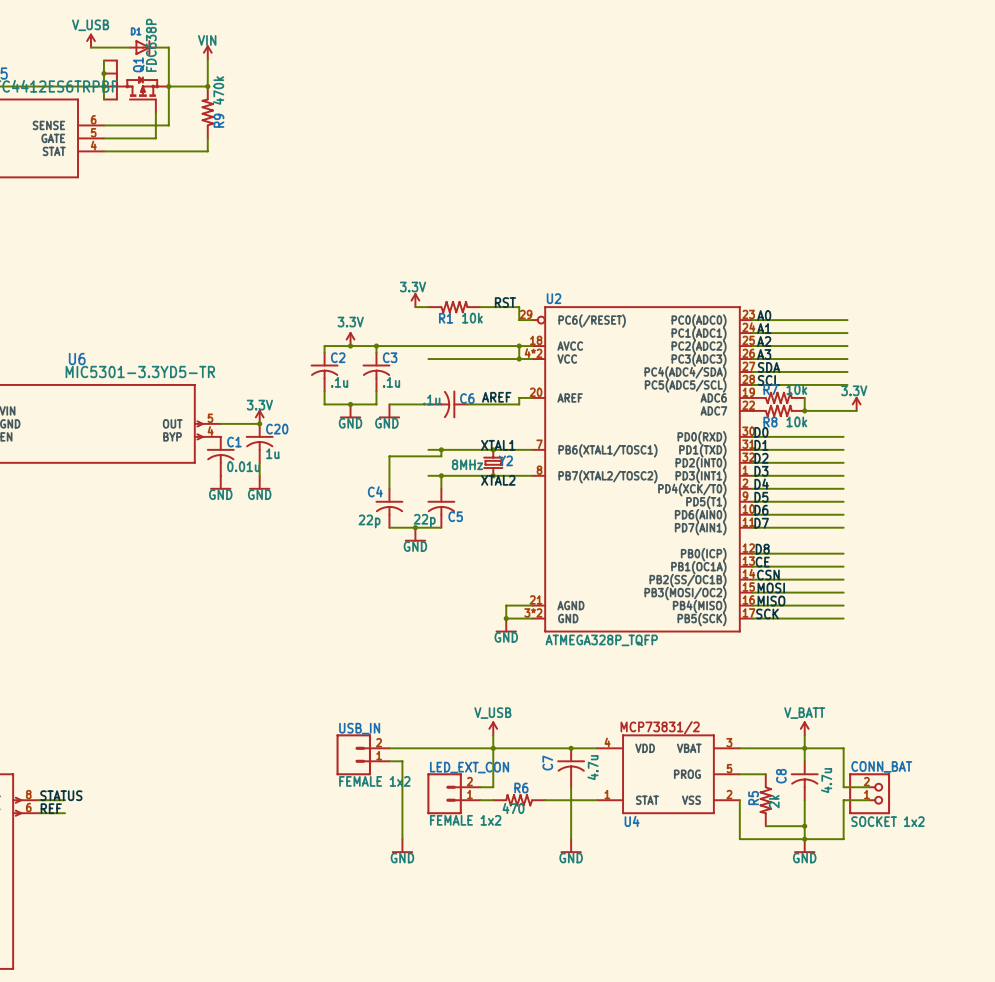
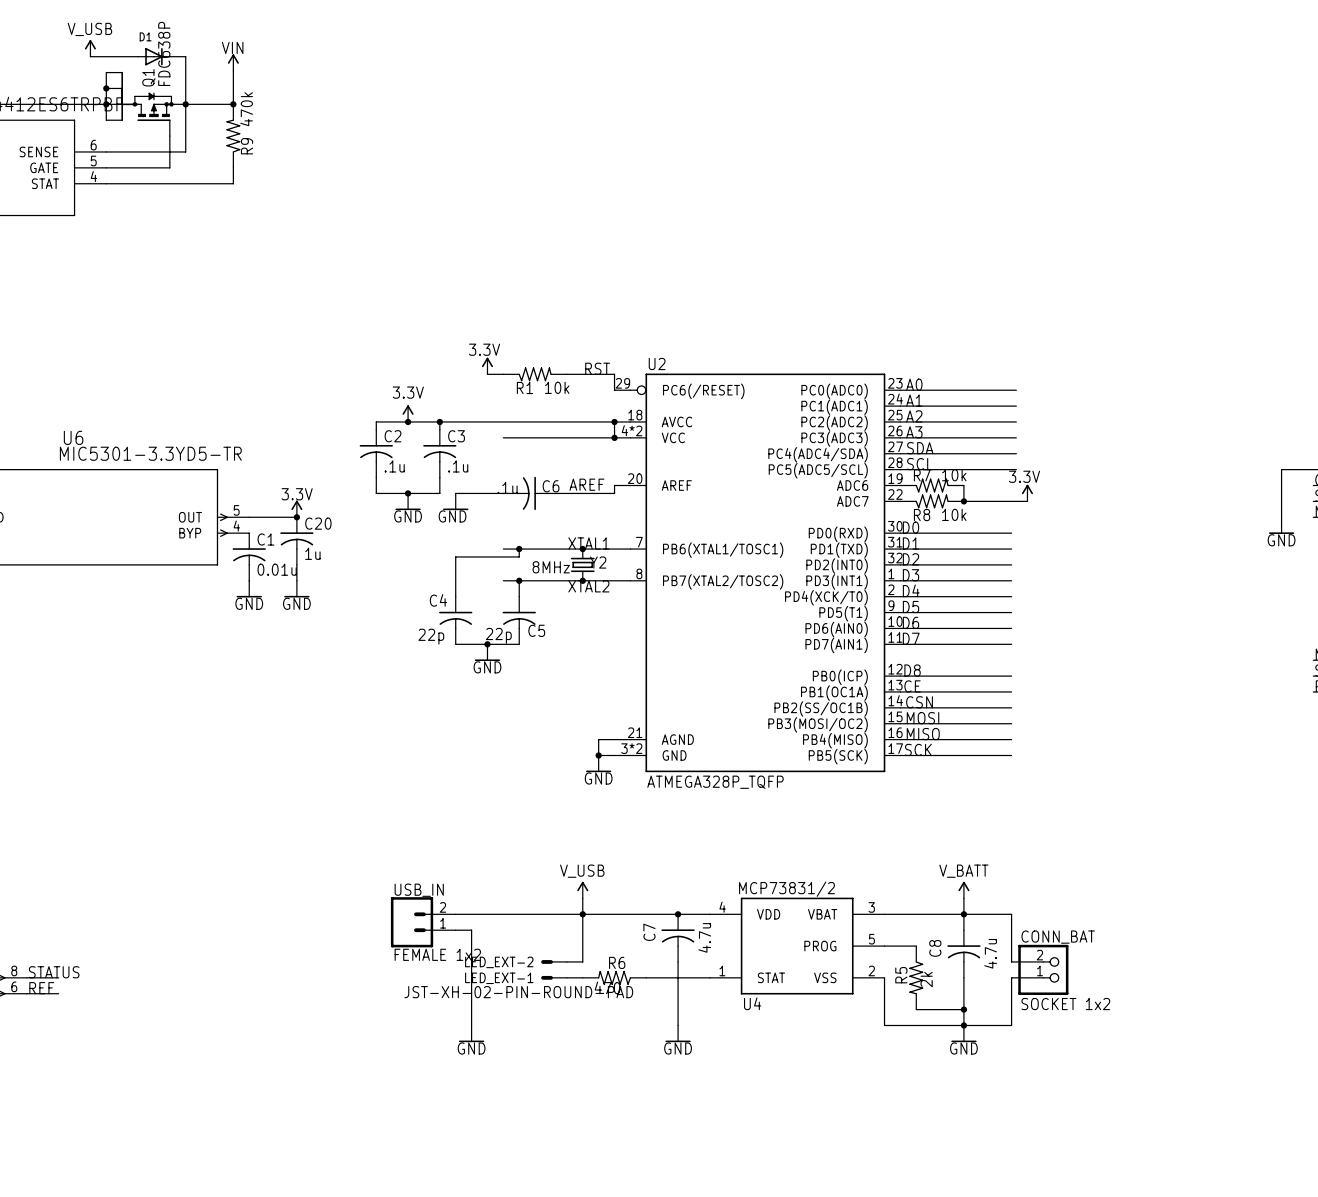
LED_EXT-2: none -> (554, 961)
LED_EXT_CON: FEMALE 1x2 (453, 793) -> none
LED_EXT-1: none -> JST-XH-02-PIN-ROUND-PAD (554, 977)

